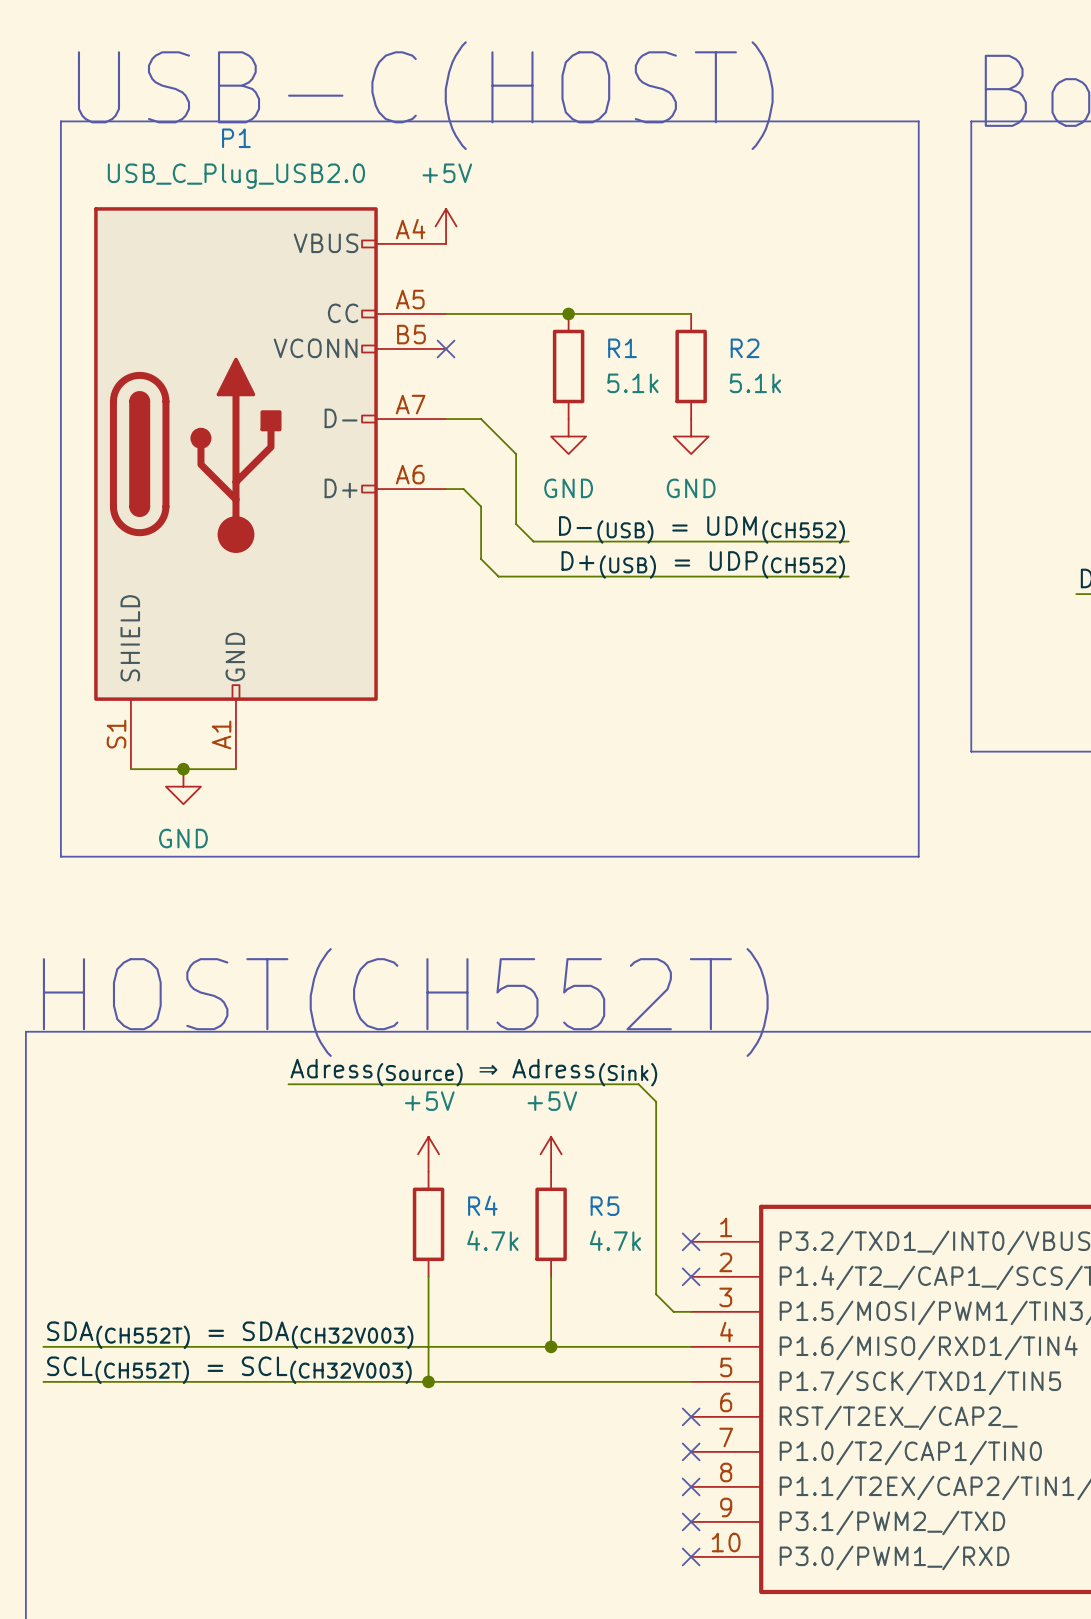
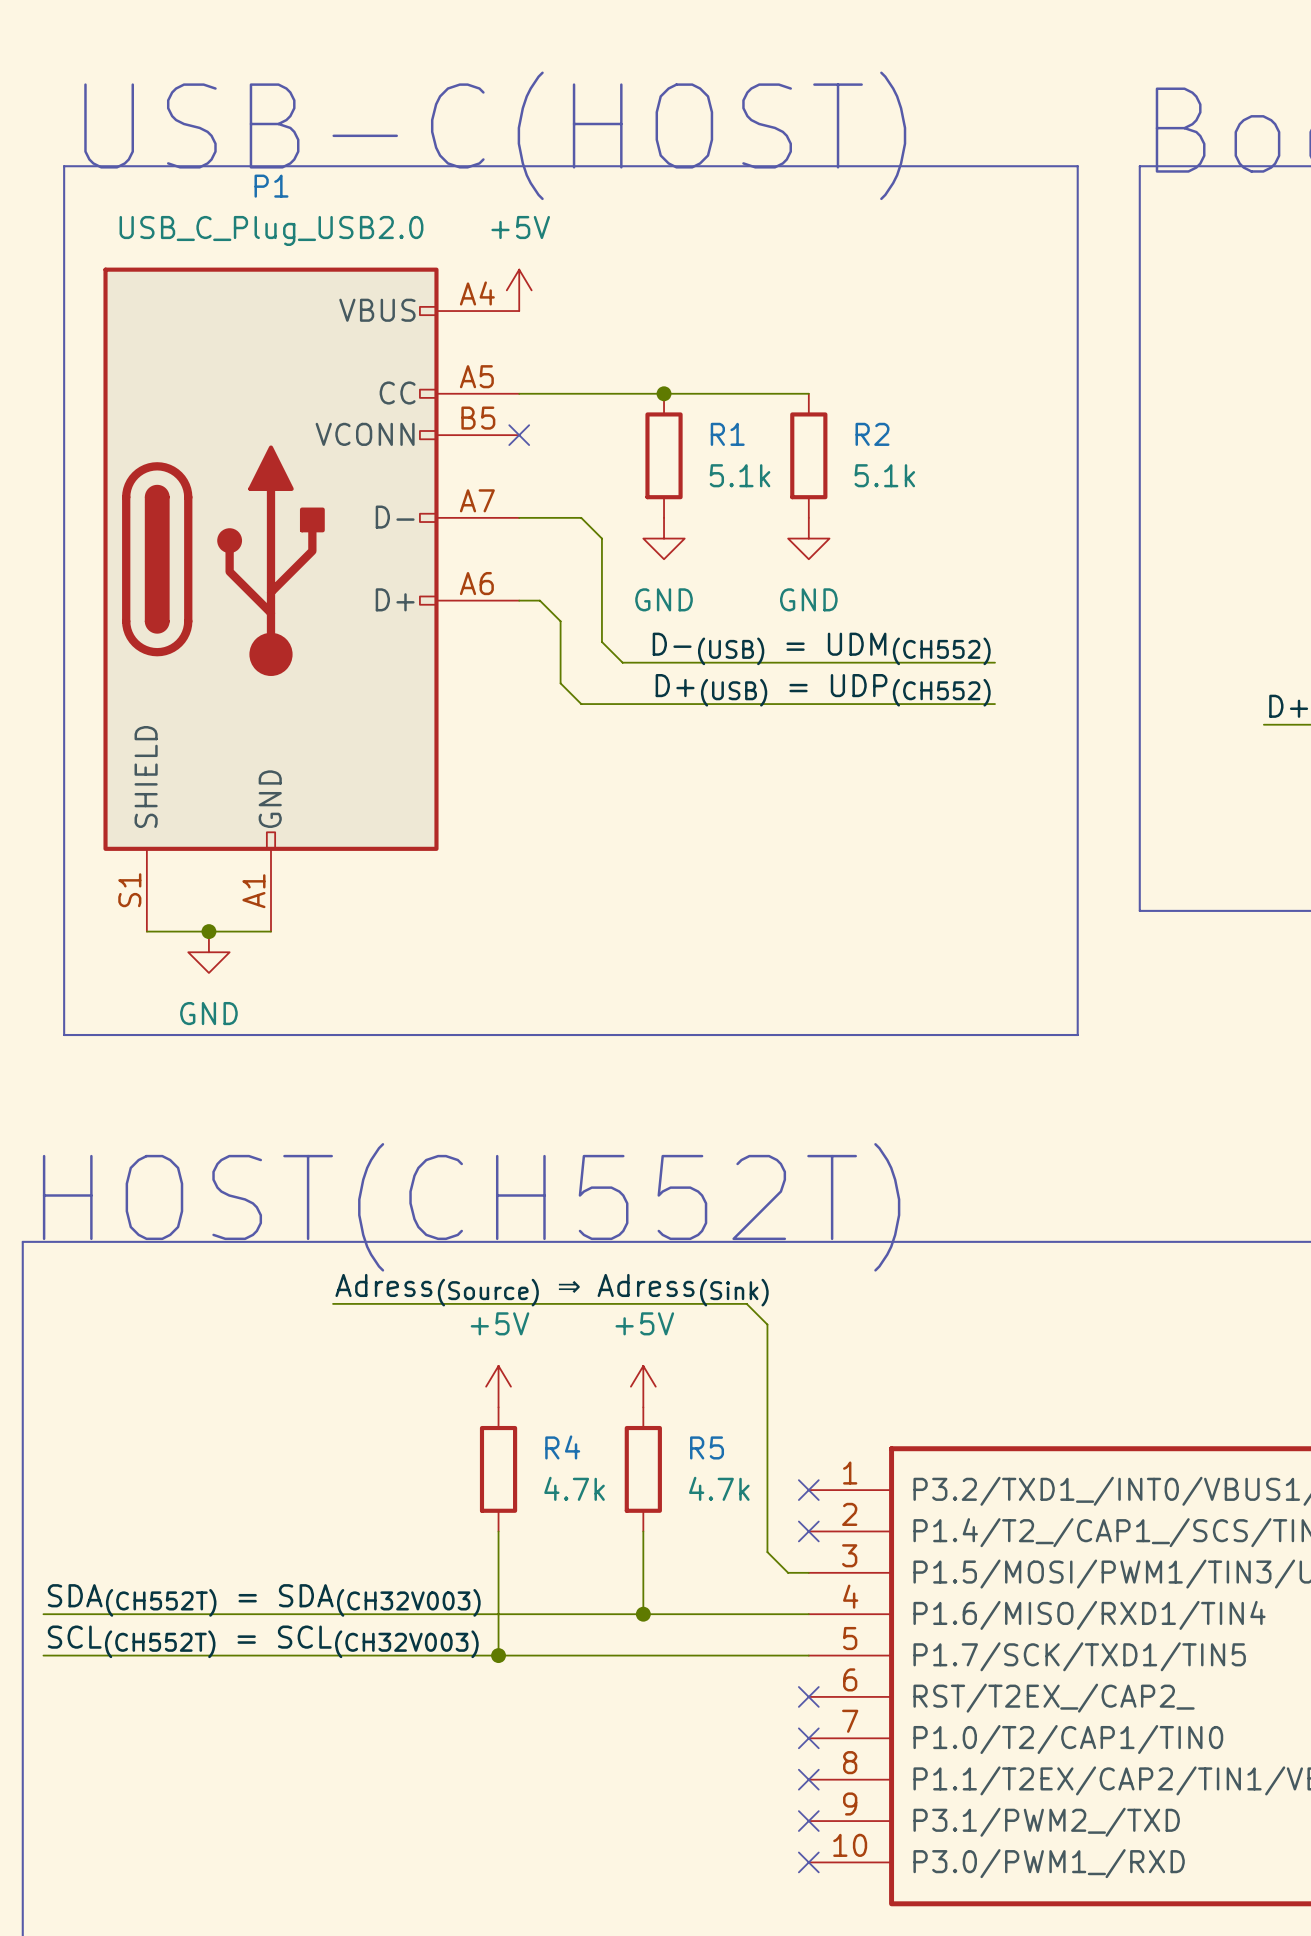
wire: (481, 419) (516, 454) -> (560, 517) (581, 517) (601, 538) (601, 559)

